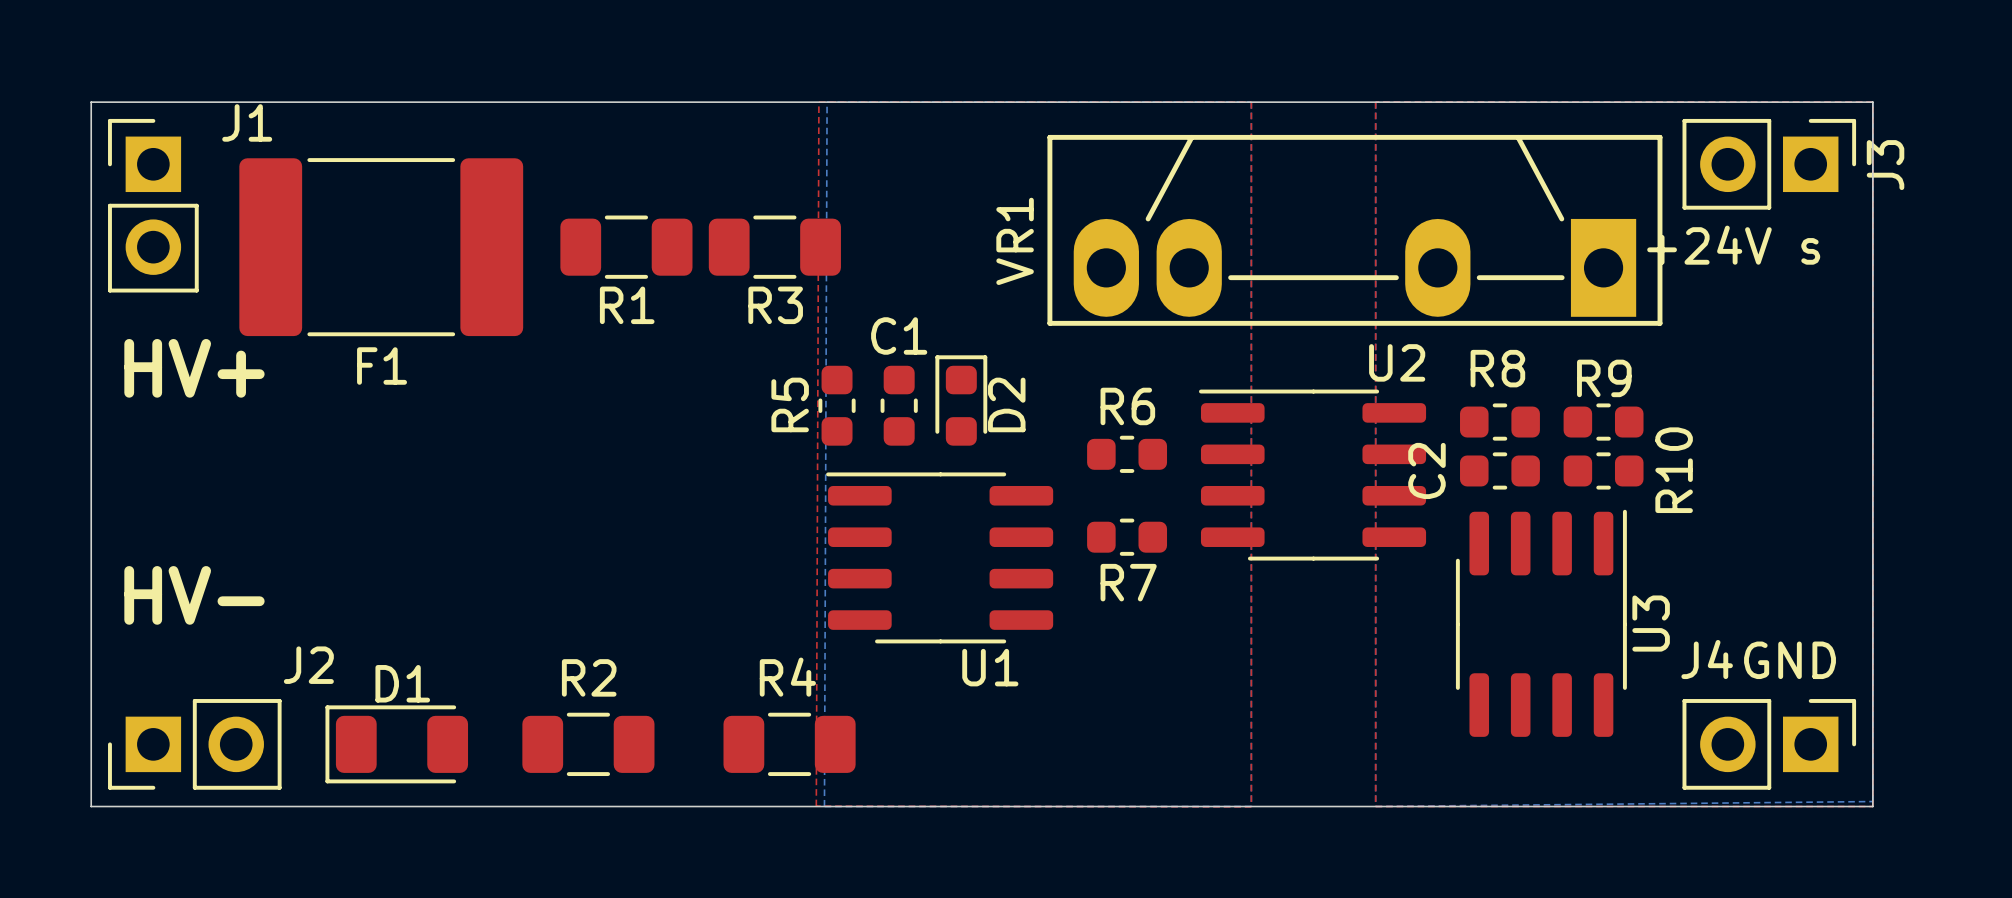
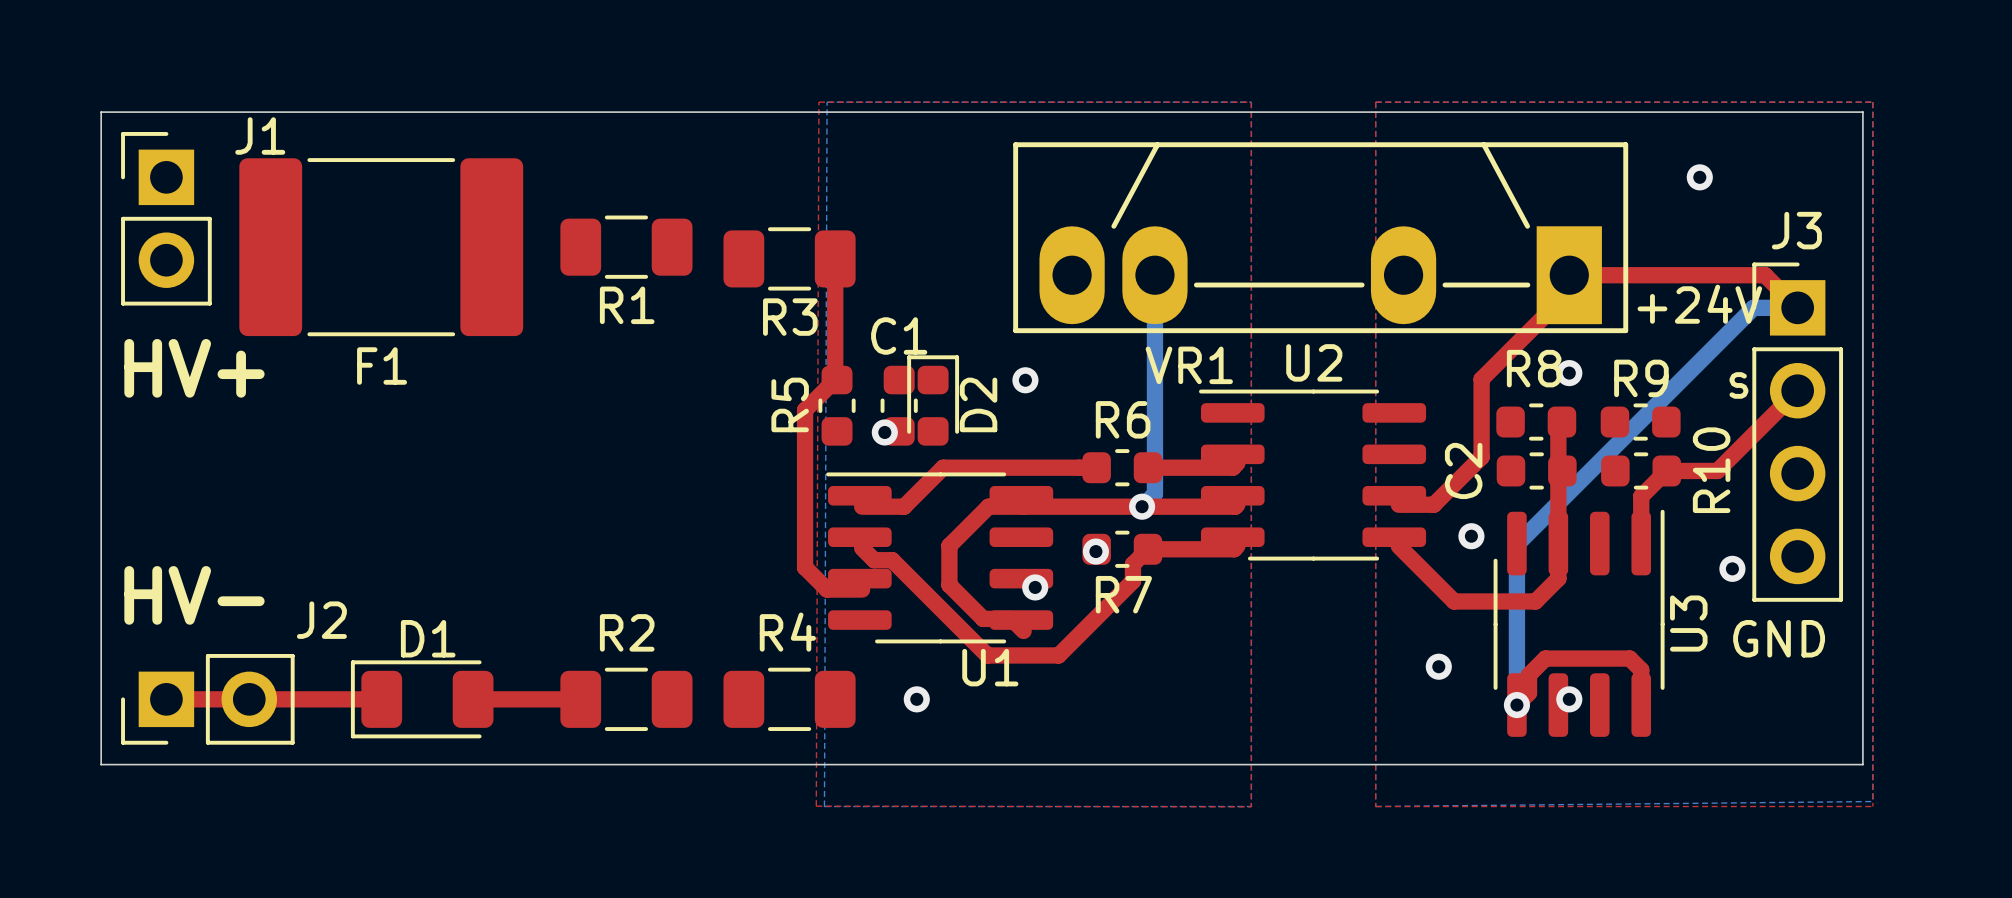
board edge: (91, 102) (91, 806) (1872, 806) (1872, 102) (91, 102) -> (101, 112) (101, 764) (1862, 764) (1862, 112) (101, 112)
J3 footprint: [1682, 118, 1857, 210] -> [1752, 262, 1844, 602]
J3 name position: J3 (1885, 165) -> J3 (1796, 230)
via: none -> (1699, 177)
J1 position: (153, 205) -> (166, 218)
VR1 position: (1354, 230) -> (1320, 237)
VR1 name rotation: 0° (1015, 241) -> 90° clockwise (1189, 365)
VR1 name position: VR1 (1015, 241) -> VR1 (1189, 365)
text position: +24V (1709, 245) -> +24V (1699, 304)
R3 position: (774, 247) -> (789, 258)
text position: s (1810, 251) -> s (1738, 385)
top track: none -> (835, 258) (835, 380) (805, 410) (805, 567) (827, 589) (862, 589)
bottom track: none -> (1154, 275) (1154, 493) (1142, 506)
top track: none -> (1797, 307) (1765, 275) (1569, 275) (1569, 291) (1481, 379) (1481, 457) (1433, 504) (1398, 504)
bottom track: none -> (1797, 307) (1753, 307) (1516, 544) (1516, 705)
U2 name position: U2 (1397, 362) -> U2 (1314, 362)
via: none -> (1569, 373)
via: none -> (1025, 380)
top track: none -> (1797, 390) (1717, 470) (1666, 470) (1641, 496) (1641, 543)
D2 position: (961, 400) -> (933, 400)
R8 position: (1499, 422) -> (1536, 422)
top track: none -> (1561, 422) (1558, 425) (1558, 578) (1535, 601) (1454, 601) (1398, 546)
R9 position: (1603, 422) -> (1640, 422)
via: none -> (884, 432)
R6 position: (1127, 454) -> (1122, 467)
top track: none -> (1237, 463) (1232, 467) (1148, 467)
top track: none -> (1096, 467) (943, 467) (904, 506) (862, 506)
C2 position: (1499, 470) -> (1536, 470)
R10 position: (1603, 470) -> (1641, 470)
top track: none -> (1237, 504) (1235, 506) (988, 506) (949, 545) (949, 585) (983, 618) (1011, 618) (1023, 631)
via: none -> (1142, 506)
via: none -> (1471, 536)
R7 position: (1127, 537) -> (1122, 549)
top track: none -> (1237, 546) (1234, 549) (1148, 549) (1132, 564) (1132, 581) (1058, 655) (987, 655) (892, 560) (874, 560) (862, 548)
via: none -> (1095, 551)
via: none -> (1732, 568)
via: none -> (1035, 587)
U3 position: (1541, 623) -> (1579, 623)
text position: GND (1790, 660) -> GND (1779, 638)
via: none -> (1438, 666)
top track: none -> (166, 699) (381, 699)
top track: none -> (473, 699) (580, 699)
via: none -> (916, 699)
via: none -> (1569, 699)
top track: none -> (1516, 705) (1529, 692) (1529, 674) (1545, 658) (1629, 658) (1641, 669) (1641, 705)
via: none -> (1516, 705)
J2 position: (194, 744) -> (207, 699)
D1 position: (396, 744) -> (422, 699)
R2 position: (588, 744) -> (626, 699)
R4 position: (789, 744) -> (789, 699)
J4: (1769, 744) -> none

